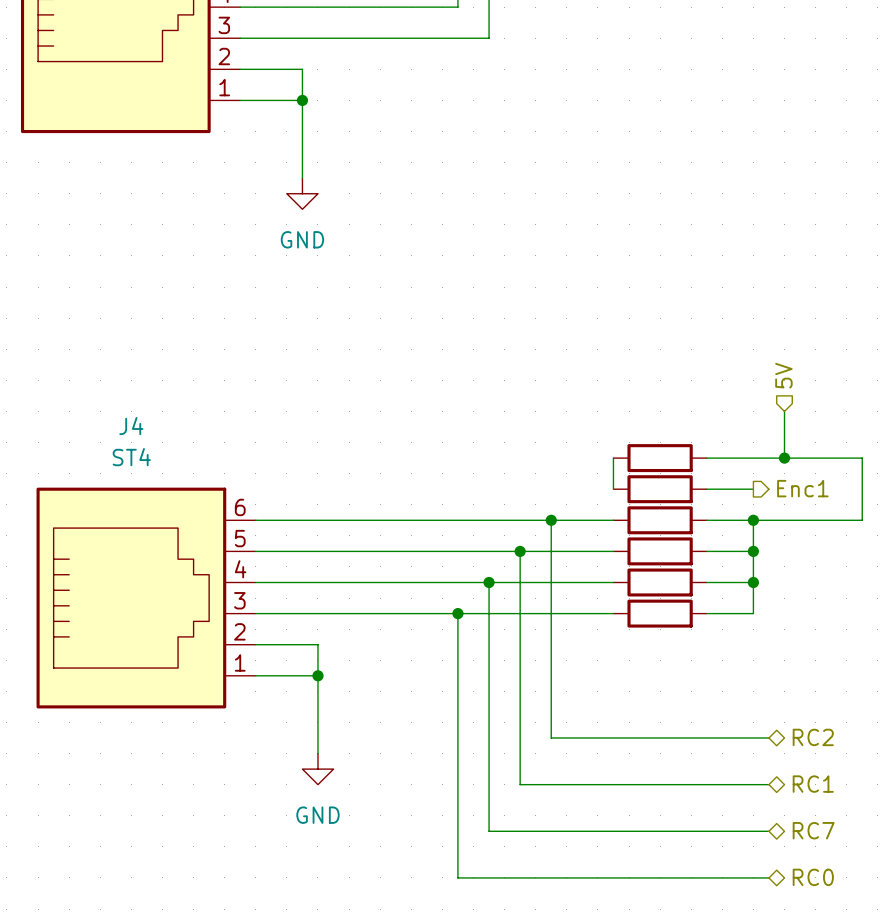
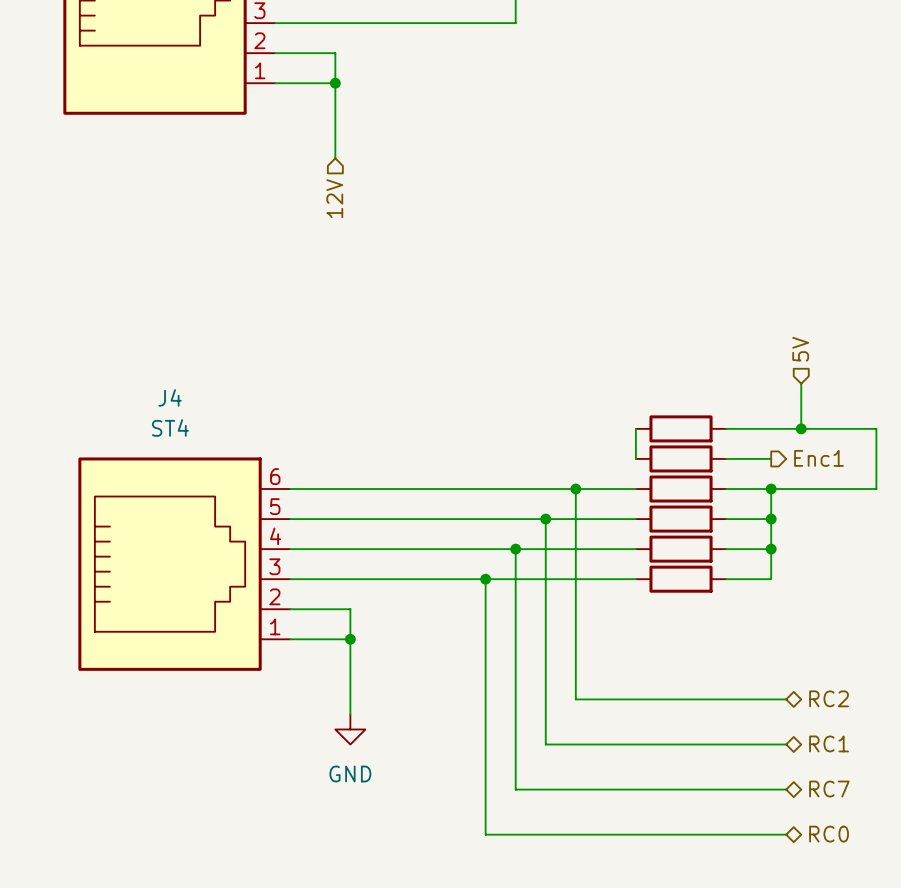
power symbol: GND (302, 193) -> none
hierarchical label: none -> 12V (334, 198)

